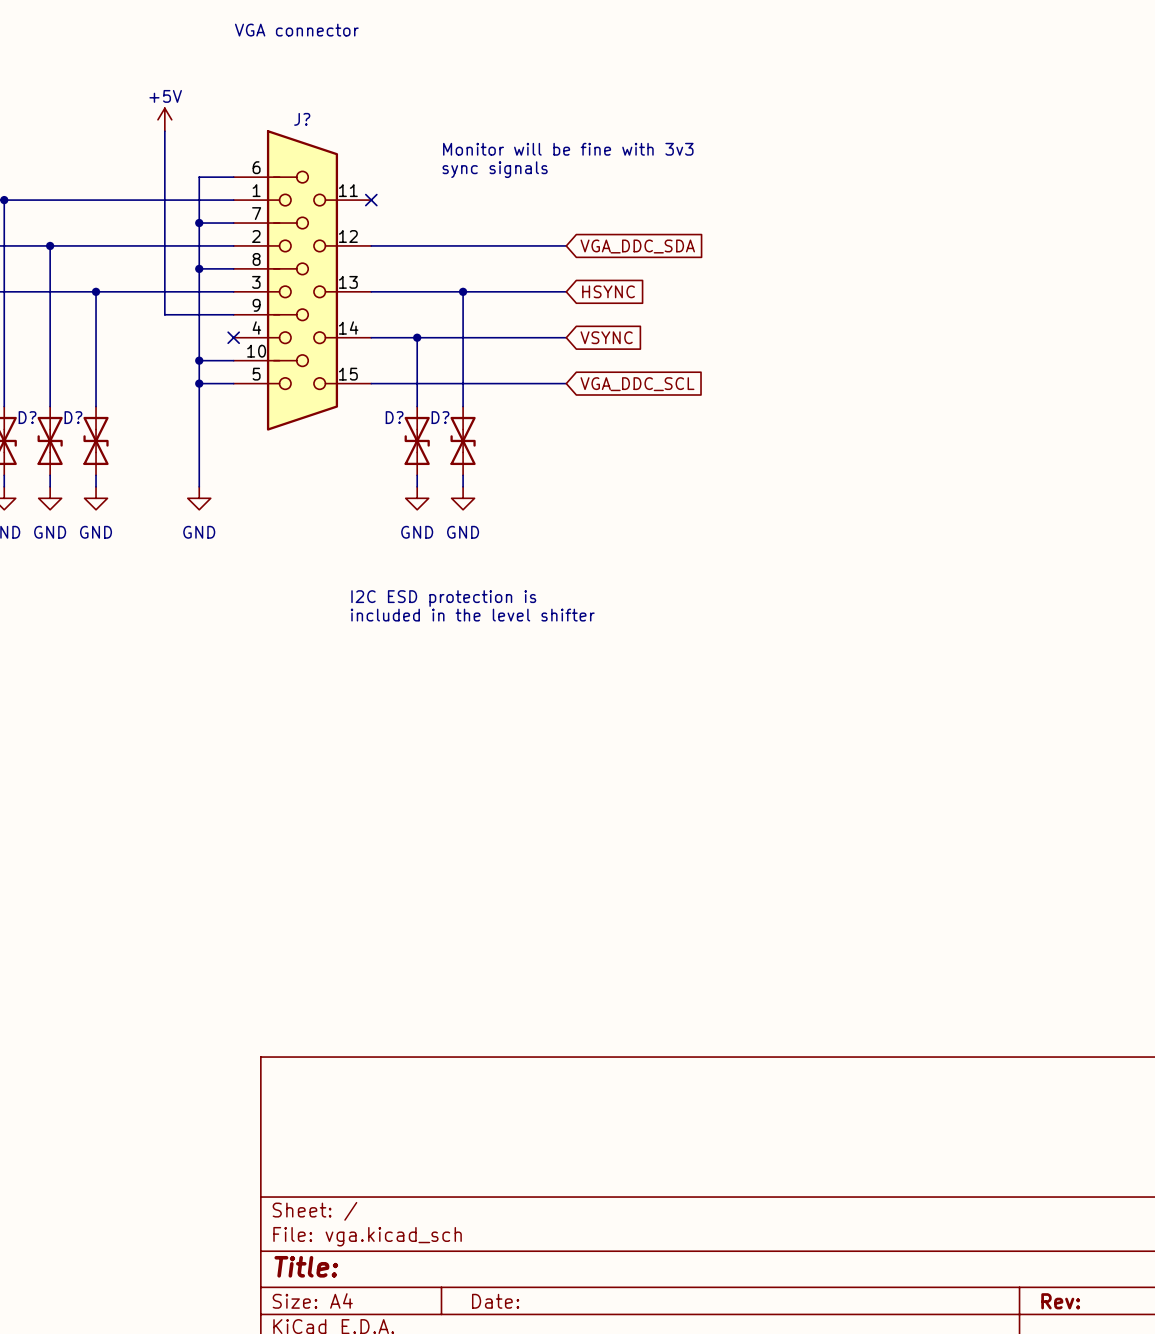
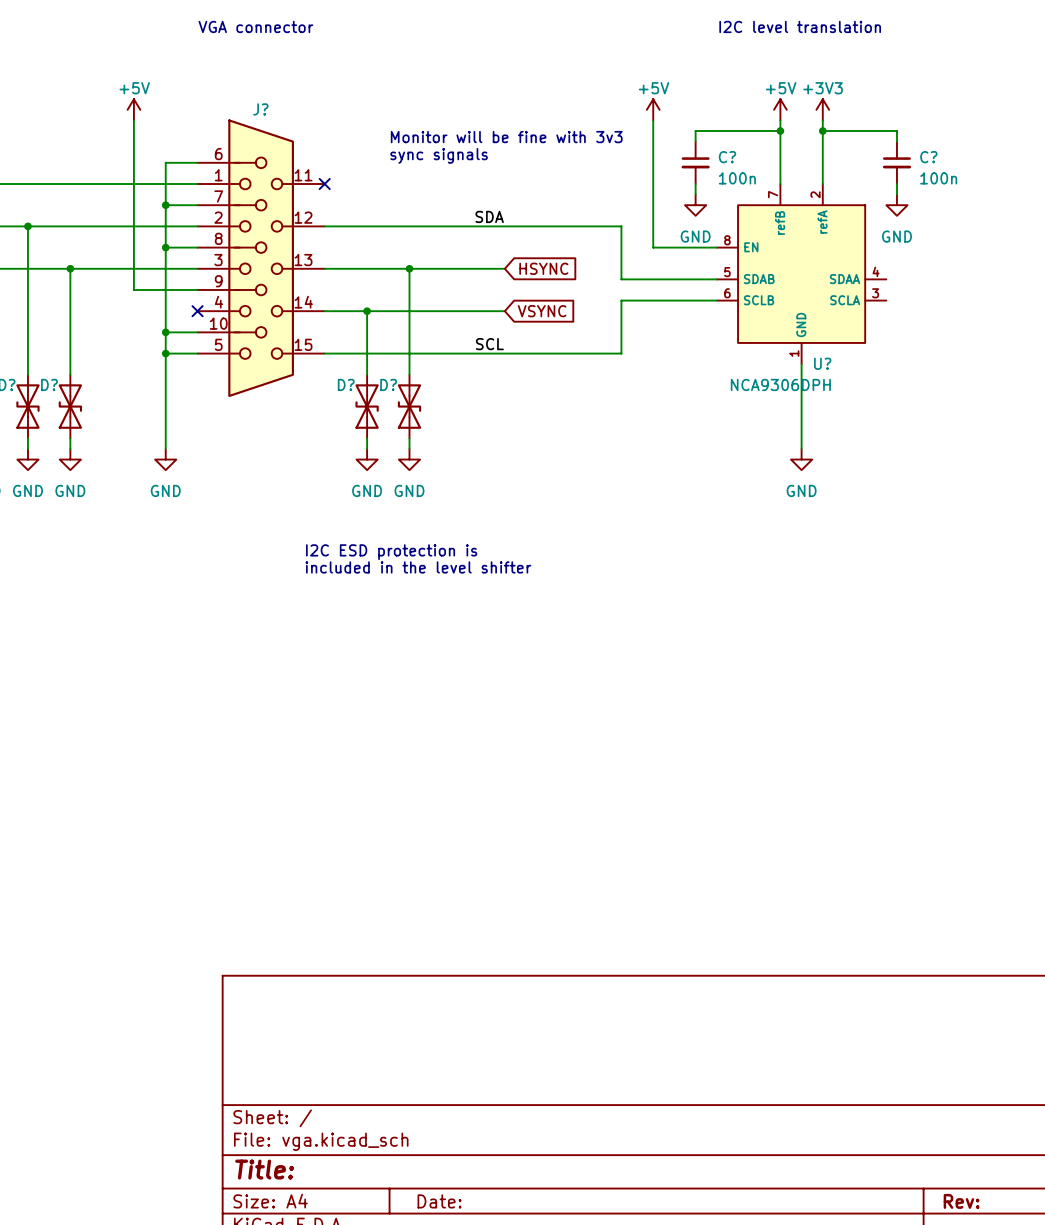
text: none -> I2C level translation (800, 26)
power symbol: none -> +5V (653, 109)
power symbol: none -> +5V (780, 109)
power symbol: none -> +3V3 (822, 109)
wire: none -> (653, 120) (653, 247) (716, 247)
wire: none -> (780, 120) (780, 184)
wire: none -> (822, 120) (822, 184)
wire: none -> (780, 131) (695, 131) (695, 141)
junction: none -> (780, 131)
wire: none -> (822, 131) (896, 131) (896, 141)
junction: none -> (822, 131)
C?: none -> 100n (695, 162)
C?: none -> 100n (896, 162)
wire: none -> (695, 184) (695, 194)
wire: none -> (896, 184) (896, 194)
power symbol: none -> GND (695, 205)
power symbol: none -> GND (896, 205)
label: none -> SDA (489, 216)
wire: none -> (504, 226) (621, 226) (621, 279) (716, 279)
global label: VGA_DDC_SDA (637, 246) -> none
U?: none -> NCA9306DPH (801, 274)
wire: none -> (716, 300) (621, 300) (621, 353) (504, 353)
label: none -> SCL (489, 344)
global label: VGA_DDC_SCL (637, 384) -> none
wire: none -> (801, 364) (801, 448)
power symbol: none -> GND (801, 459)

